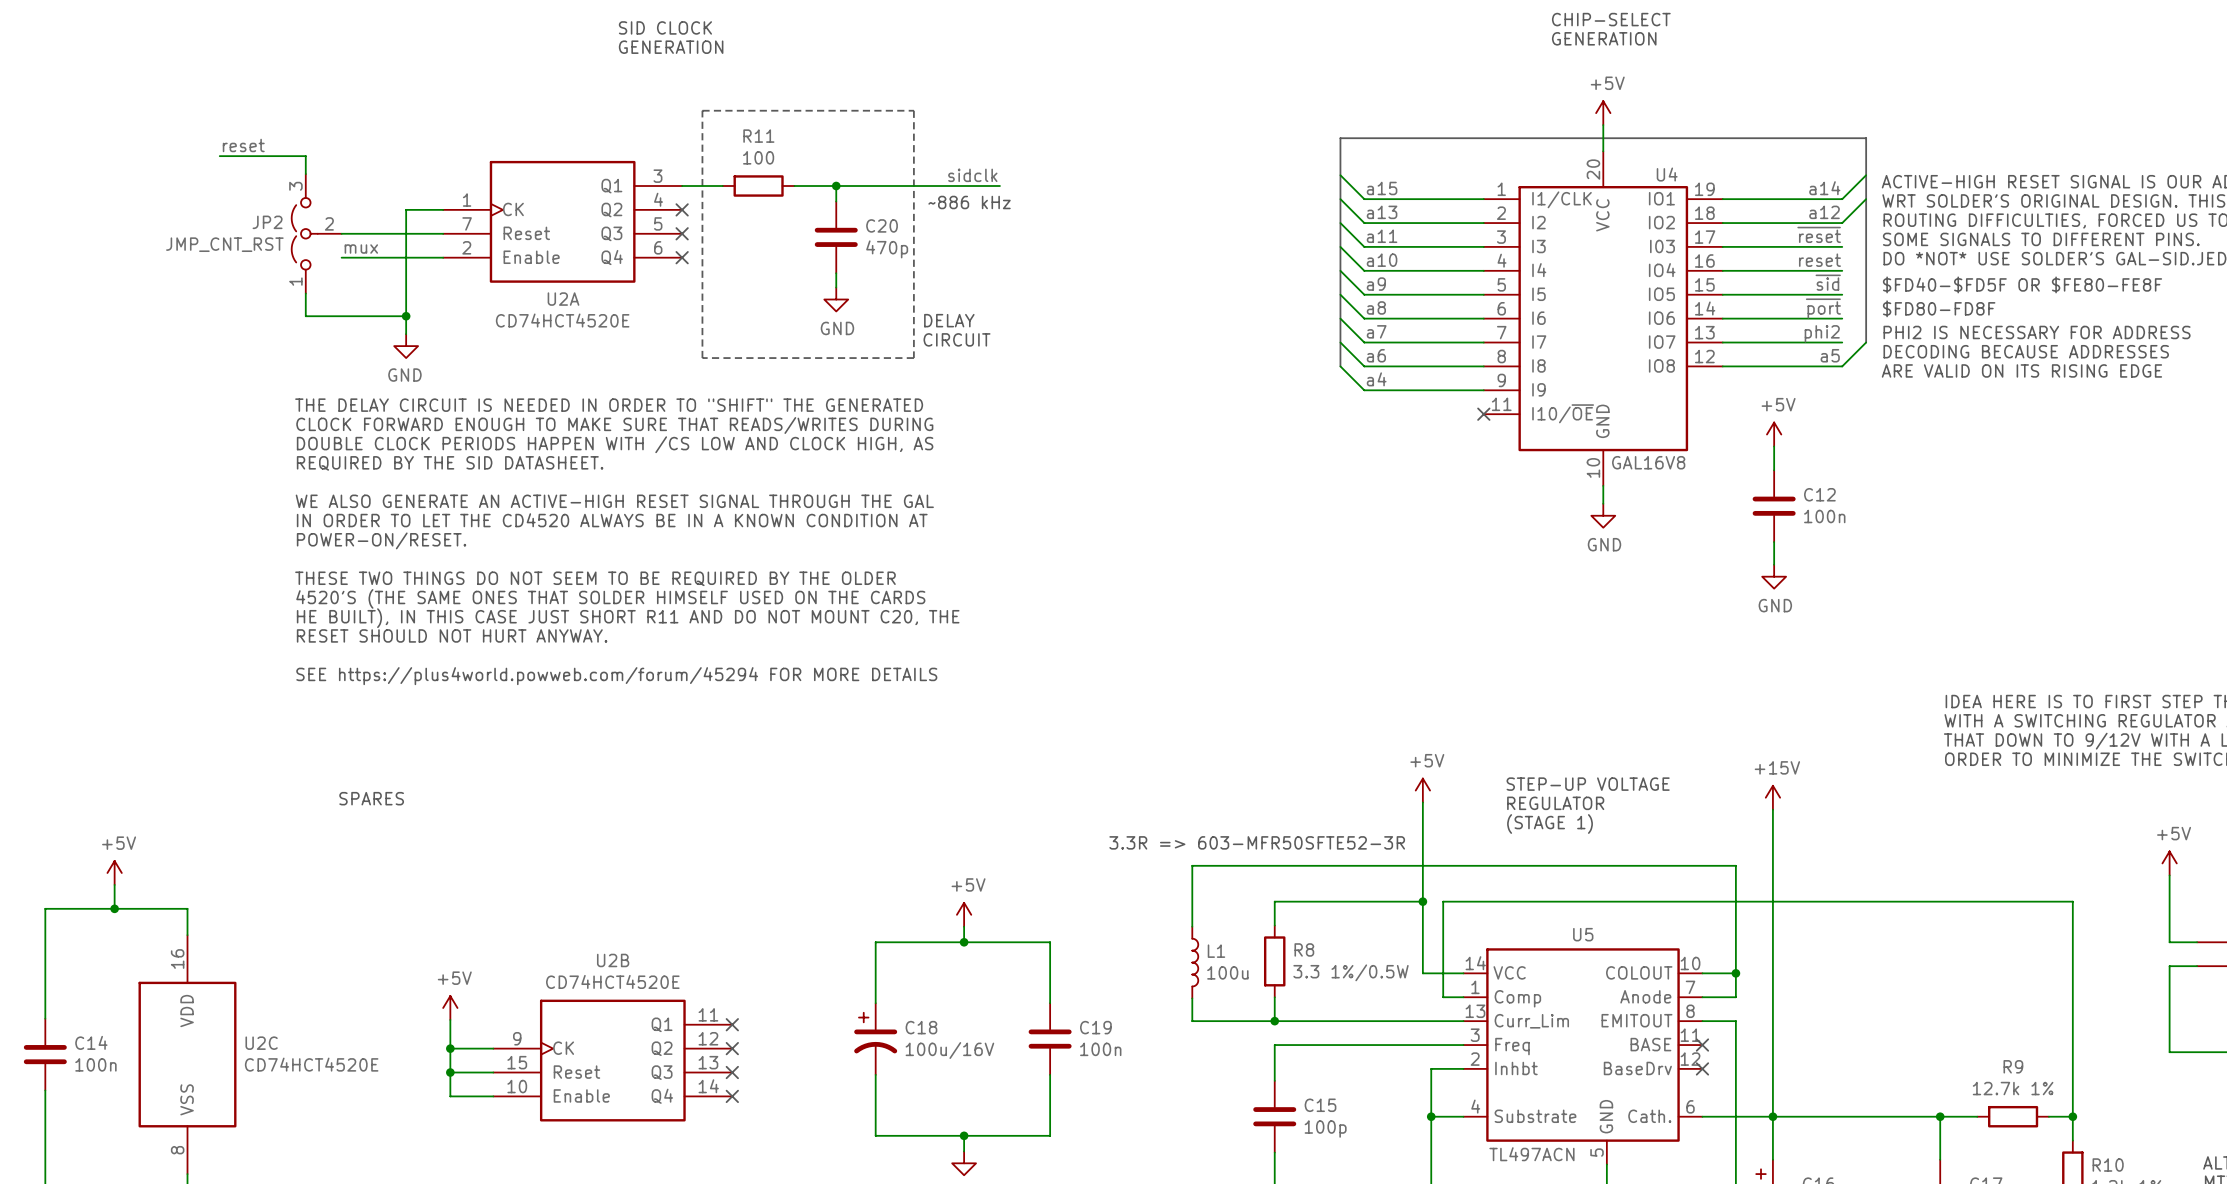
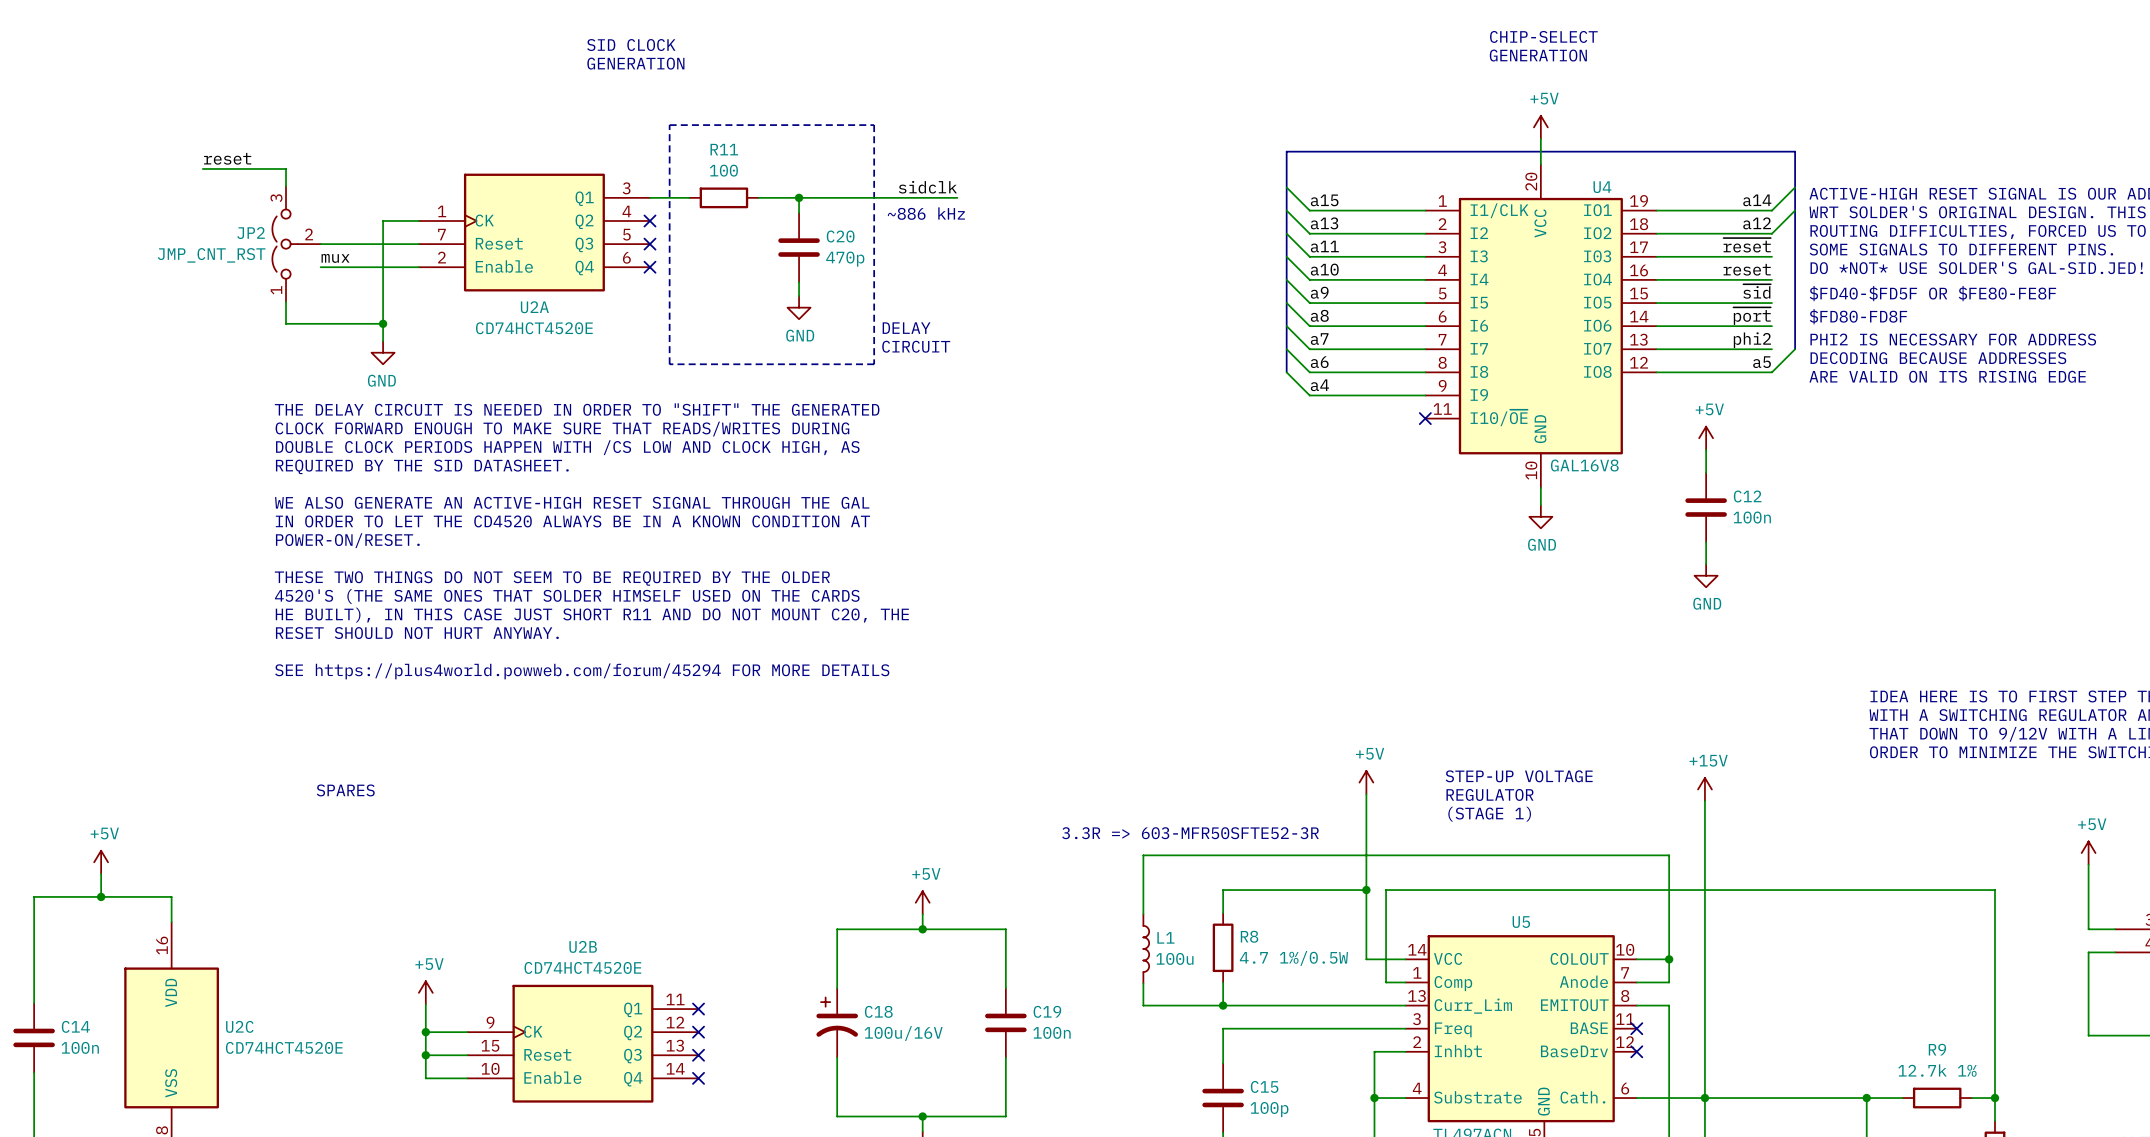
R8 value: 3.3 1%/0.5W (1351, 972) -> 4.7 1%/0.5W (1293, 958)

